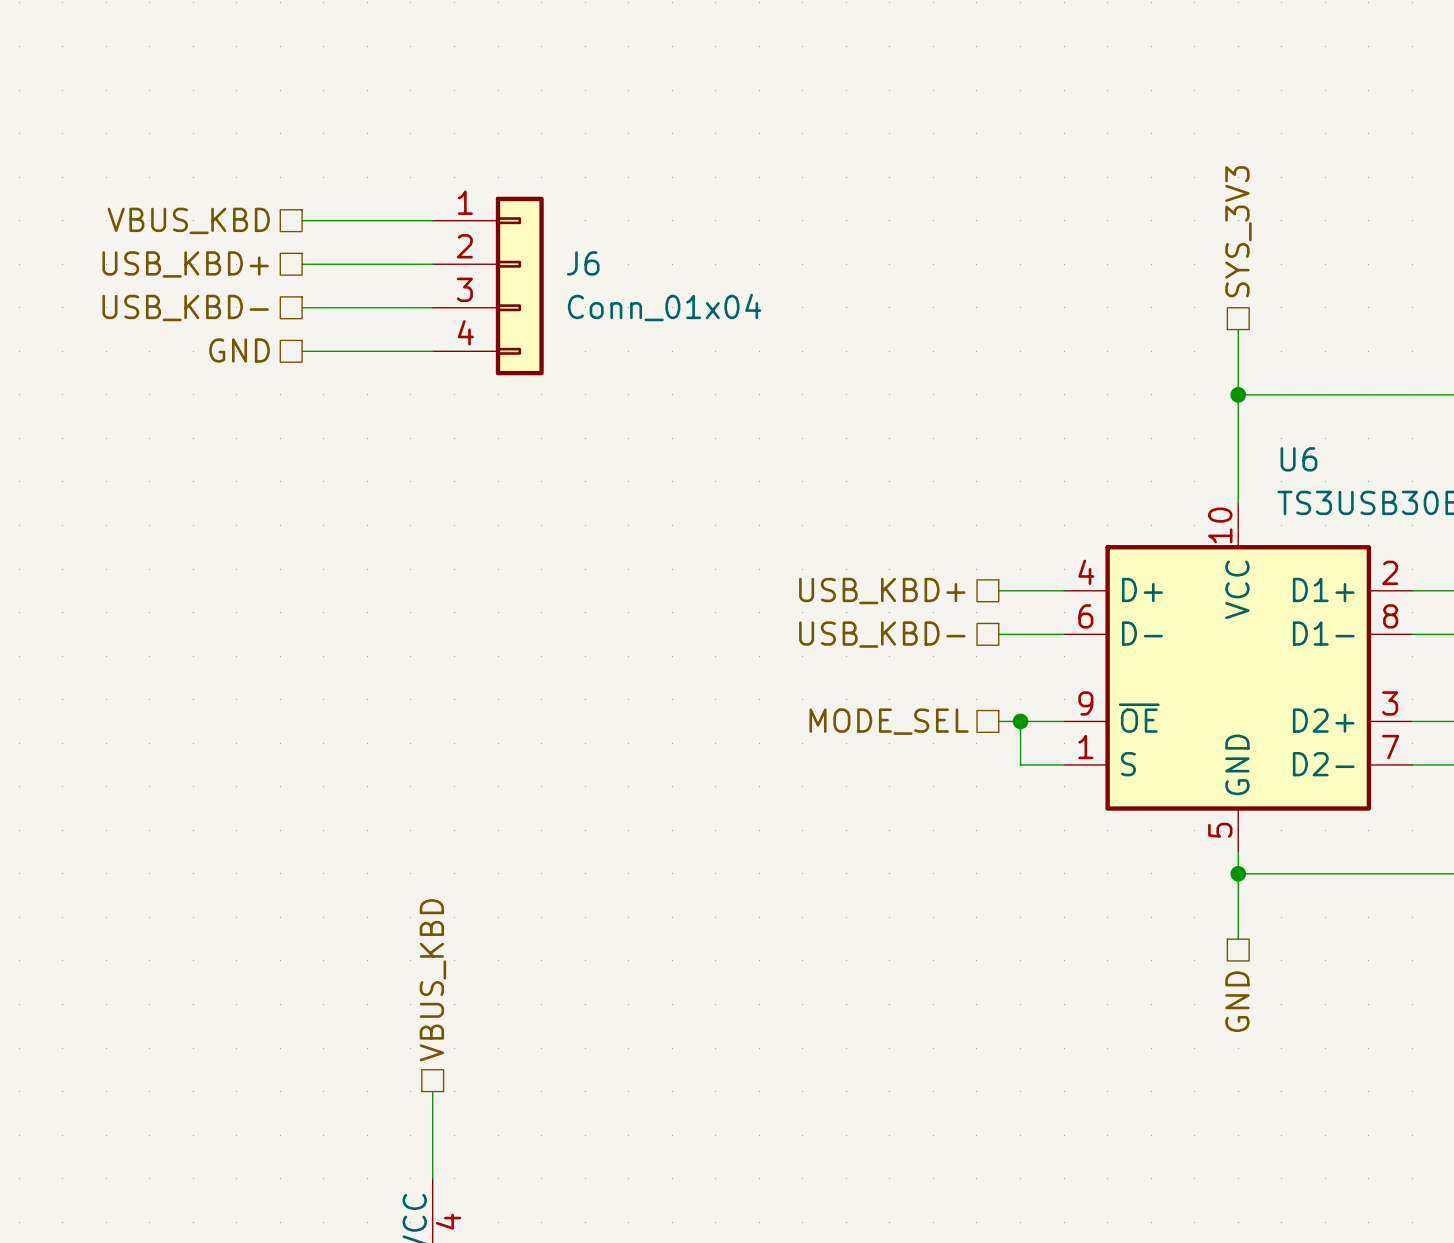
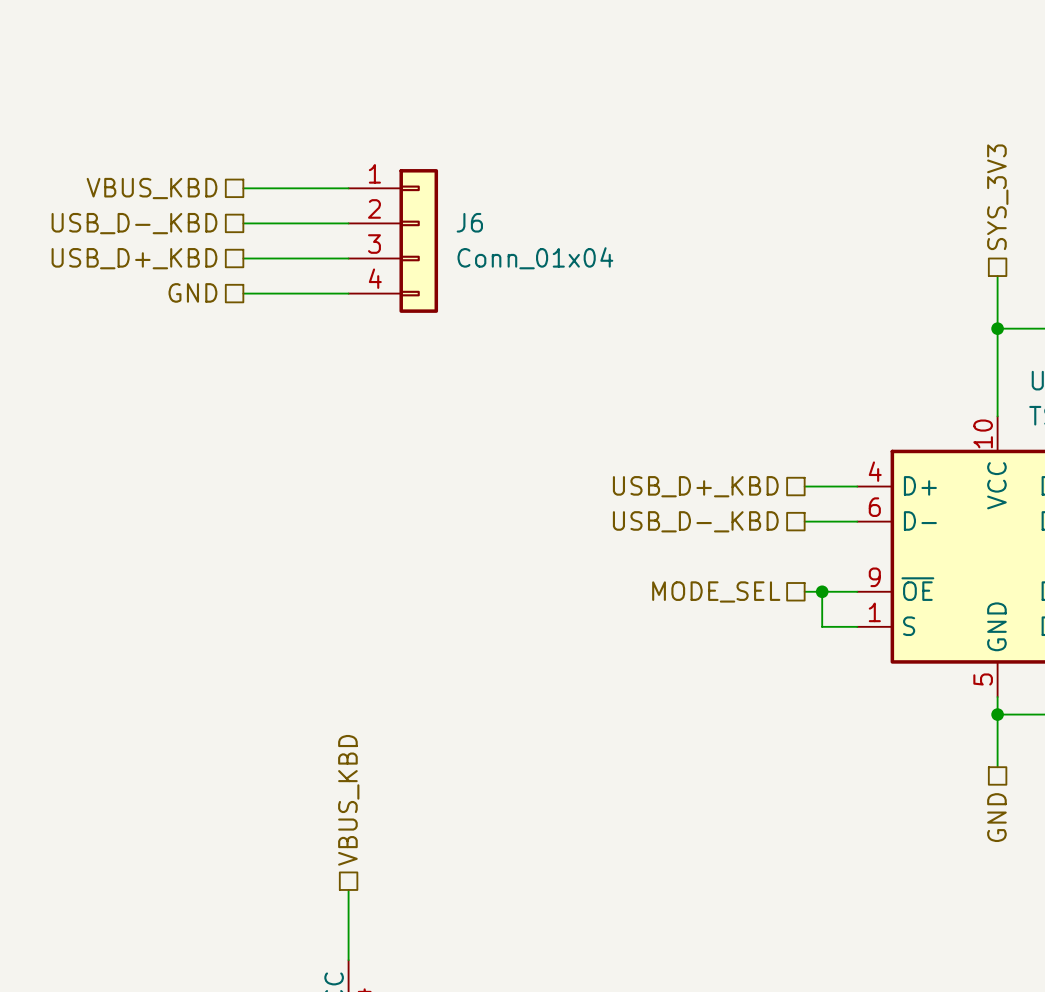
hierarchical label: USB_KBD+ (185, 264) -> USB_D-_KBD (134, 223)
hierarchical label: USB_KBD- (185, 308) -> USB_D+_KBD (134, 258)
hierarchical label: USB_KBD+ (882, 591) -> USB_D+_KBD (695, 486)
hierarchical label: USB_KBD- (882, 634) -> USB_D-_KBD (695, 521)

